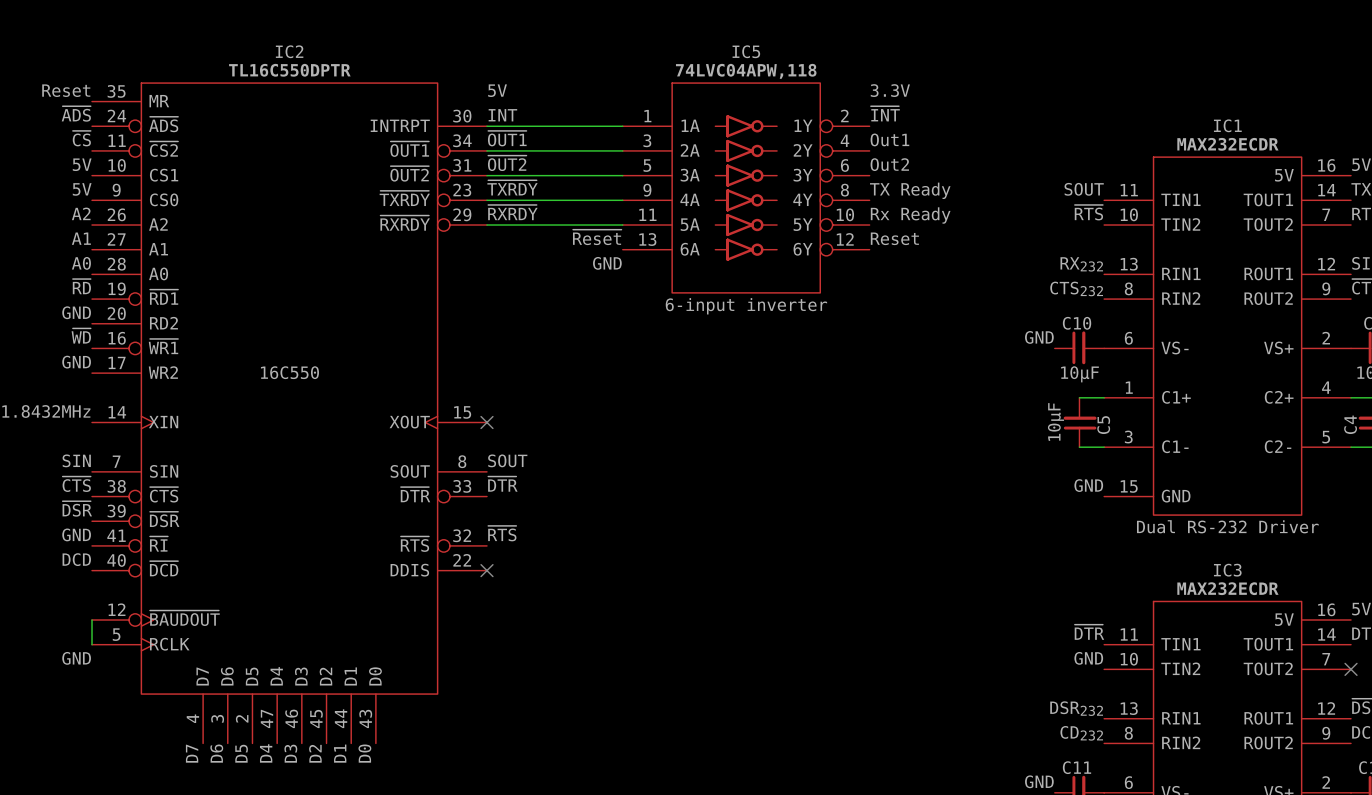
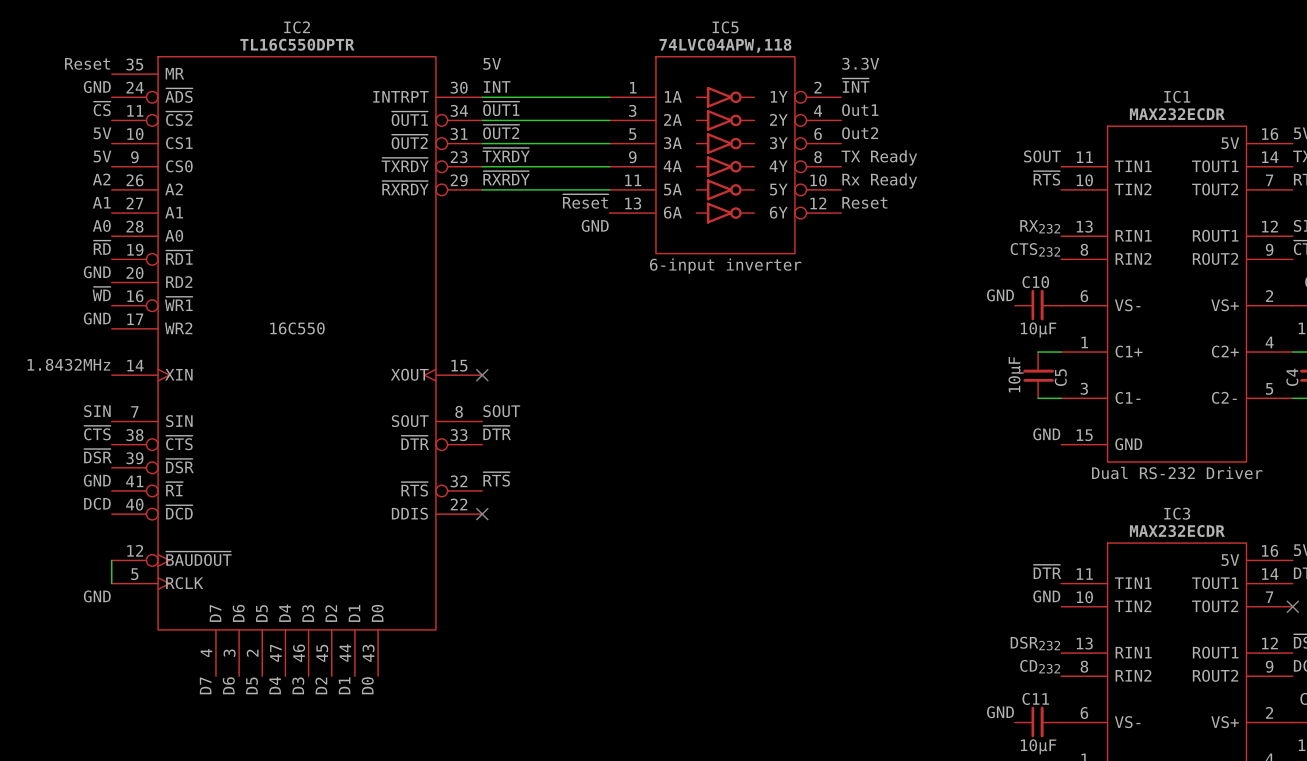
label: ~{ADS} (76, 113) -> GND (97, 86)

